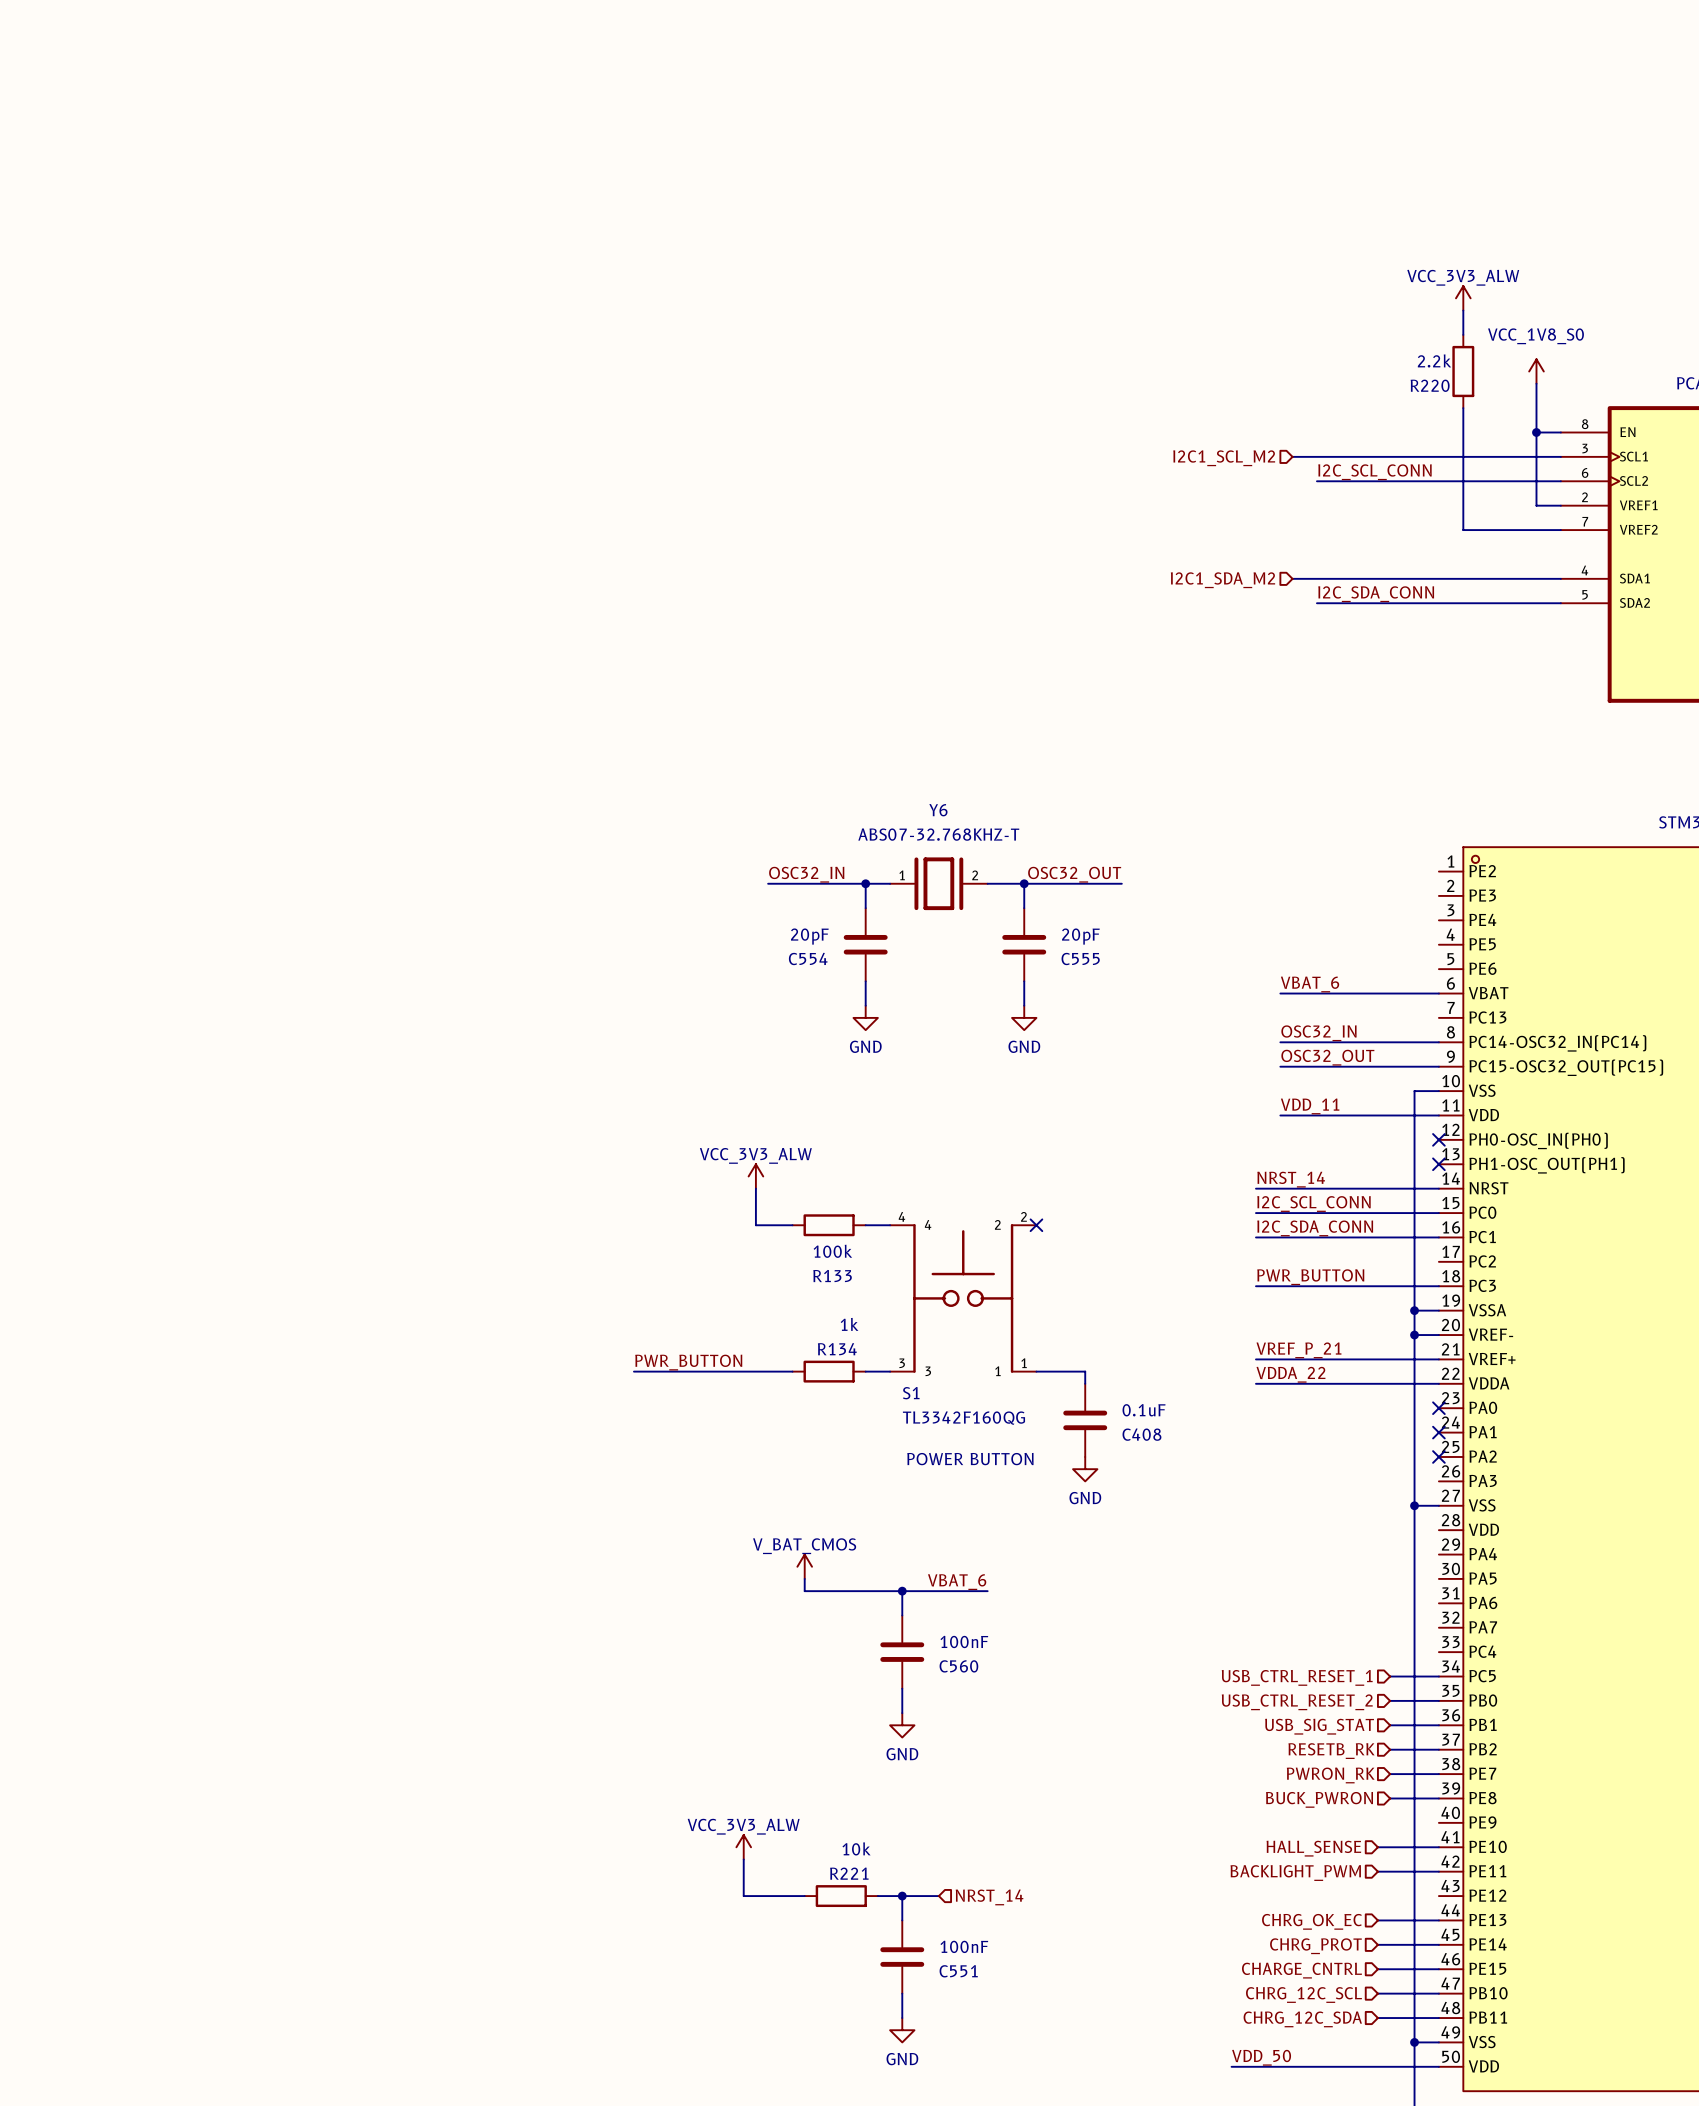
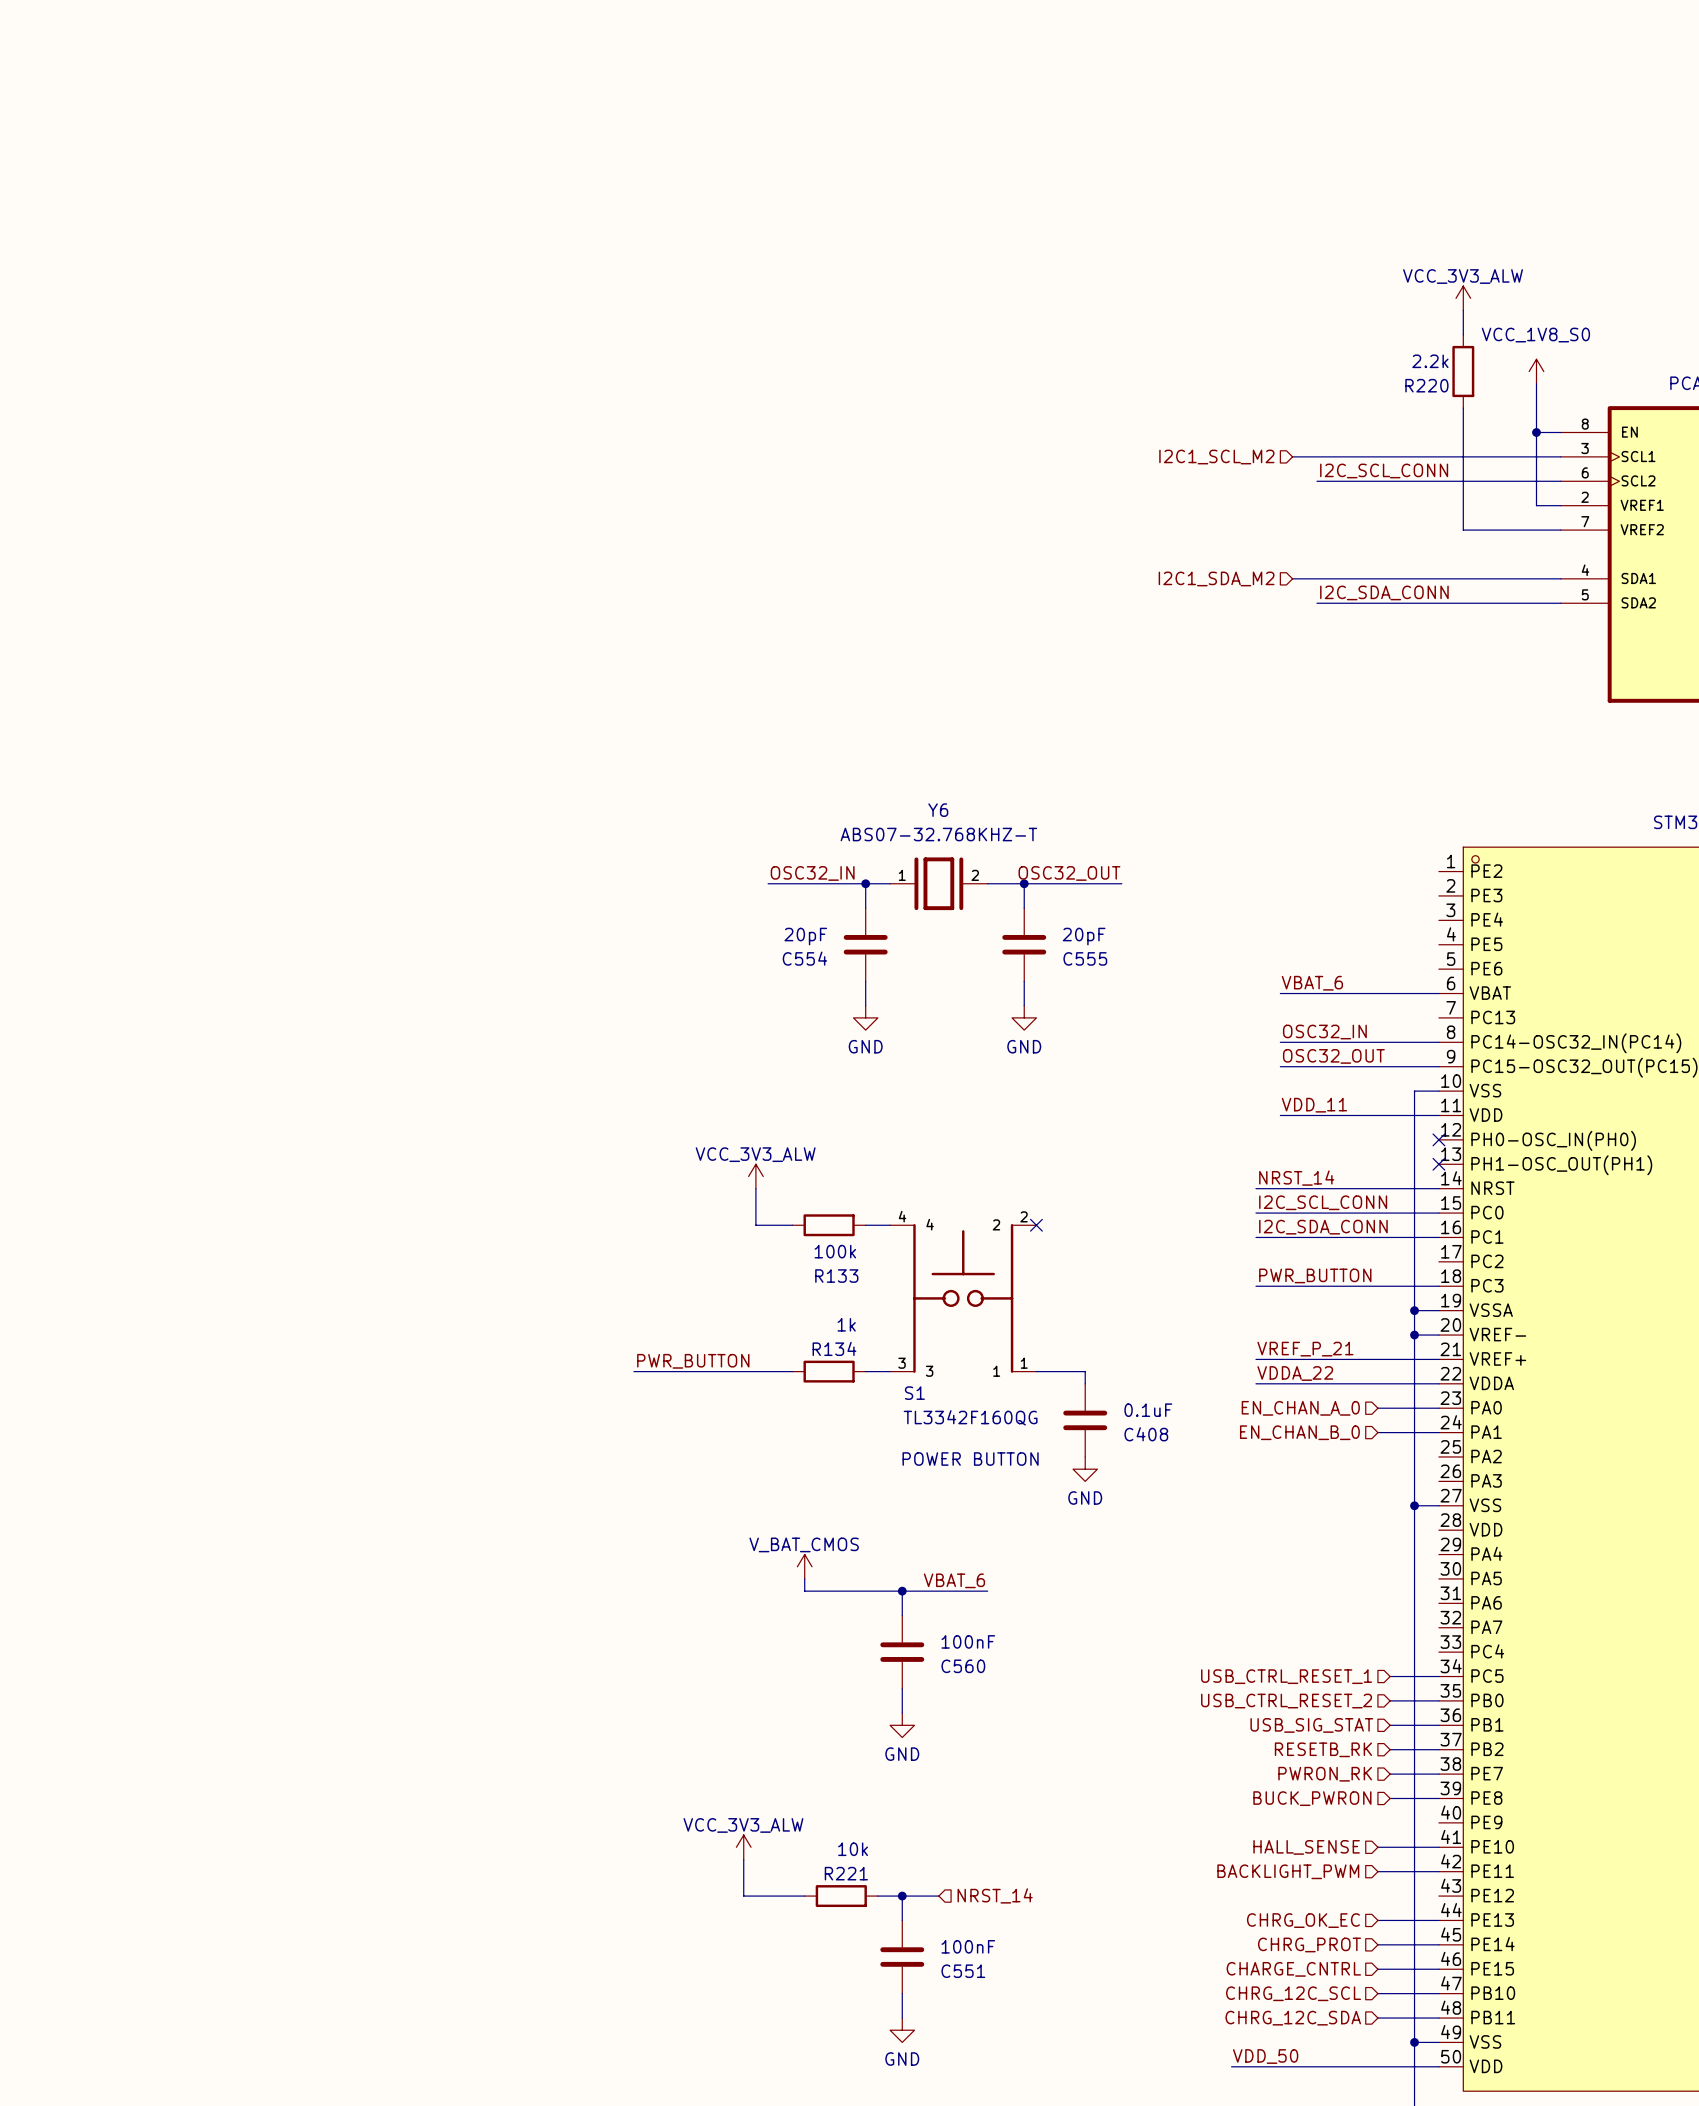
wire: none -> (1377, 1408) (1438, 1408)
no-connect mark: (1438, 1408) -> none
hierarchical label: none -> EN_CHAN_A_0 (1300, 1408)
wire: none -> (1377, 1432) (1438, 1432)
no-connect mark: (1438, 1432) -> none
hierarchical label: none -> EN_CHAN_B_0 (1299, 1432)
no-connect mark: (1438, 1456) -> none

